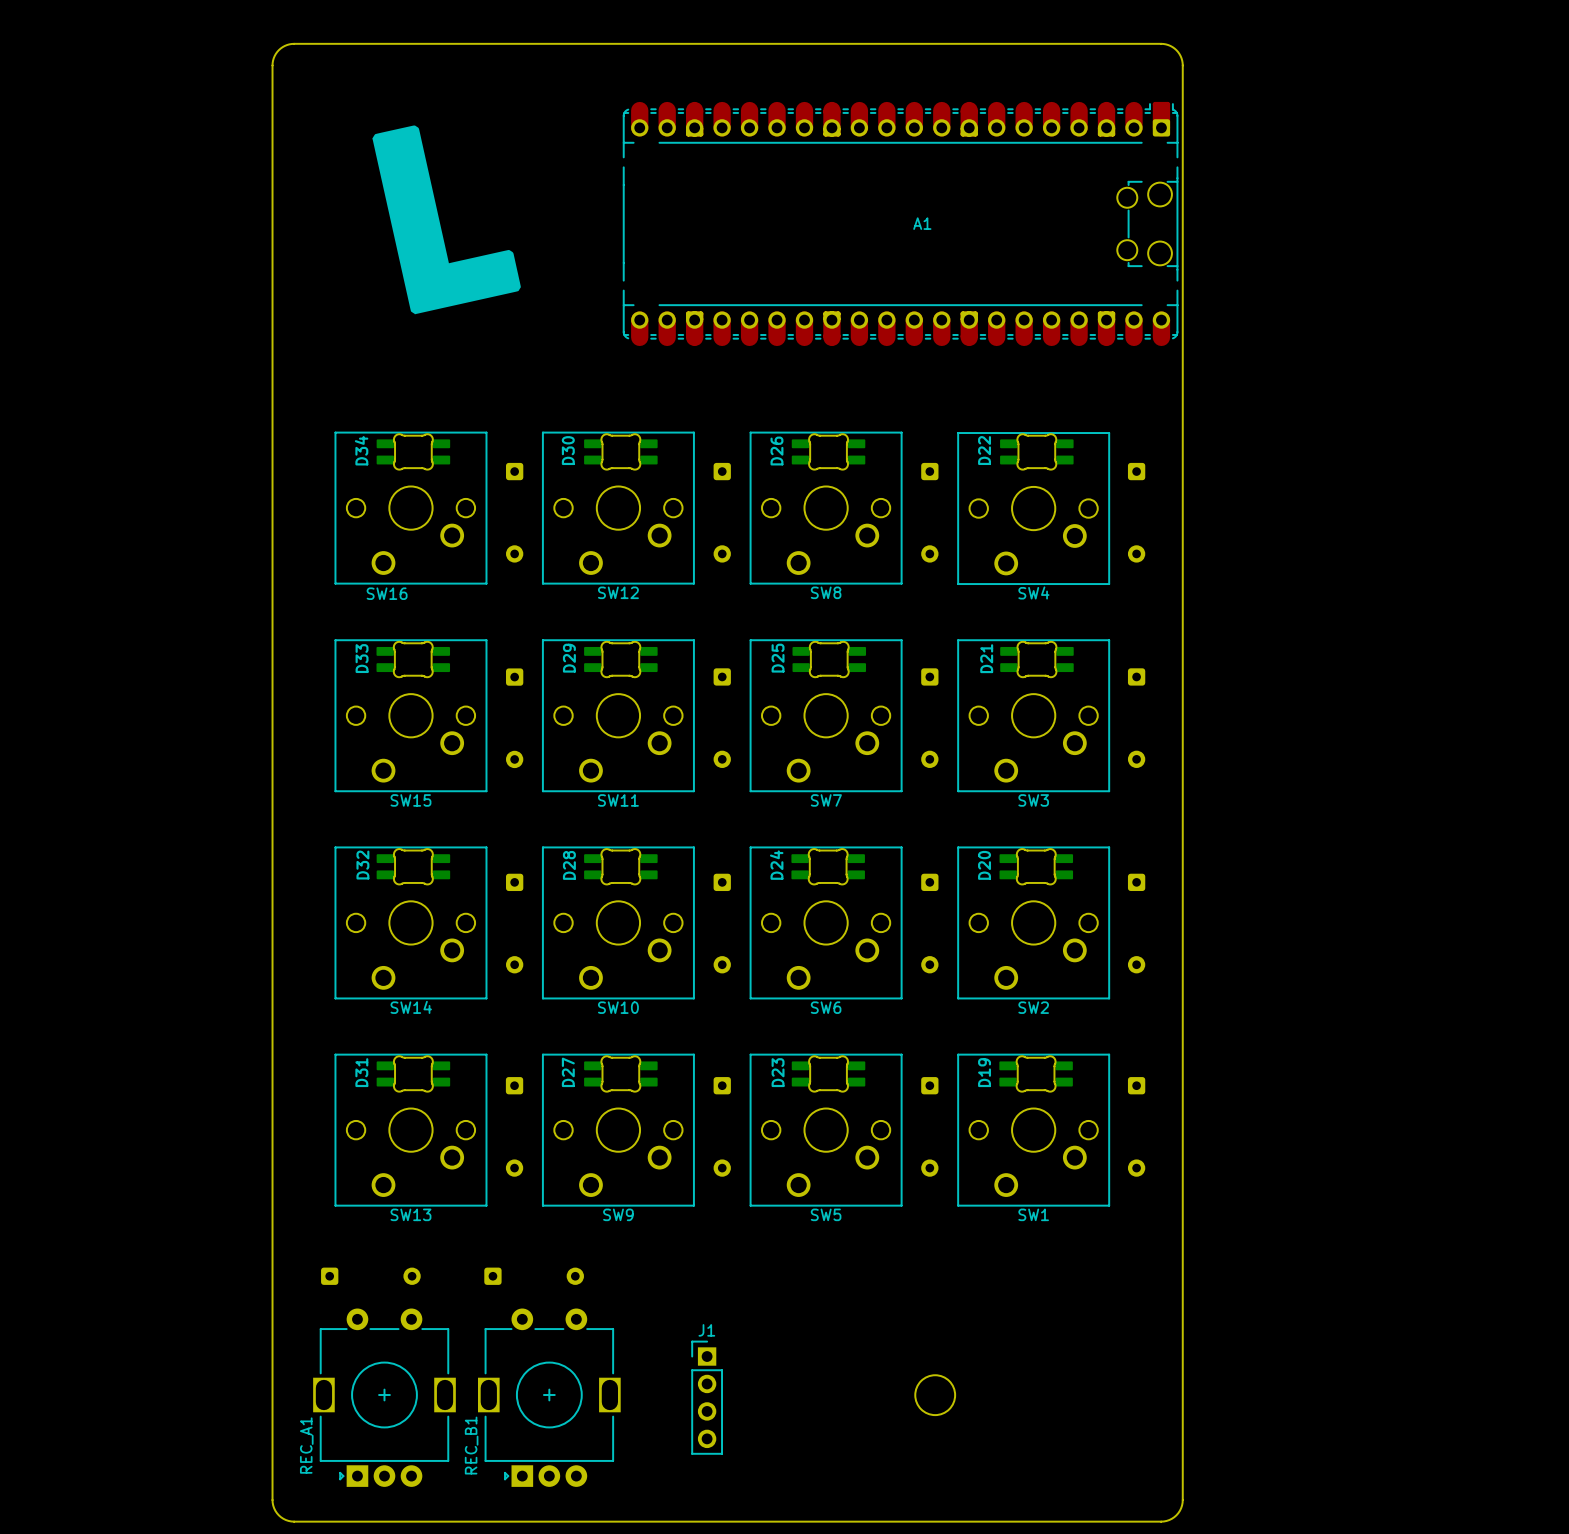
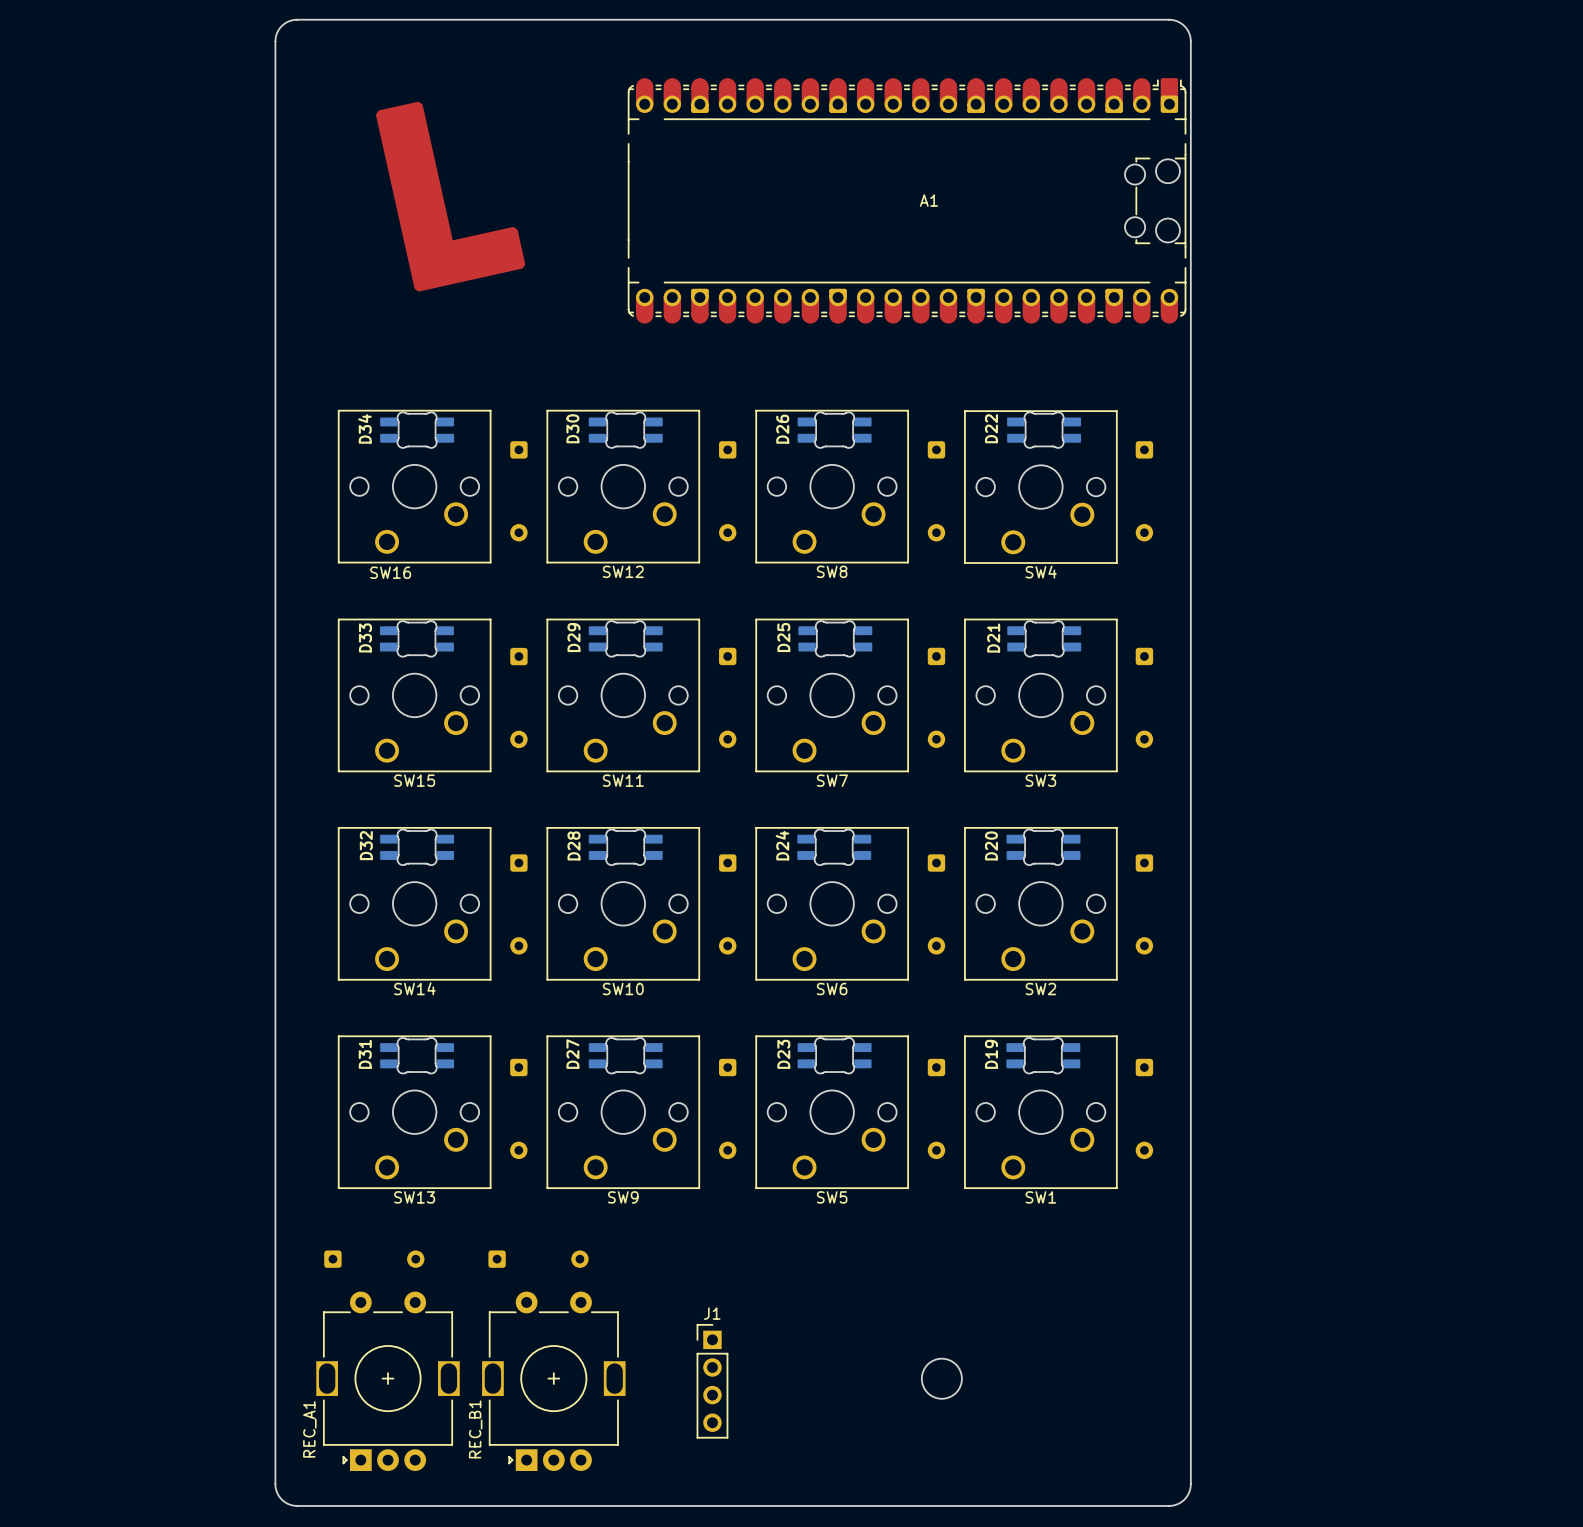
drawing shape: [372, 125, 521, 315] -> [375, 101, 526, 292]

